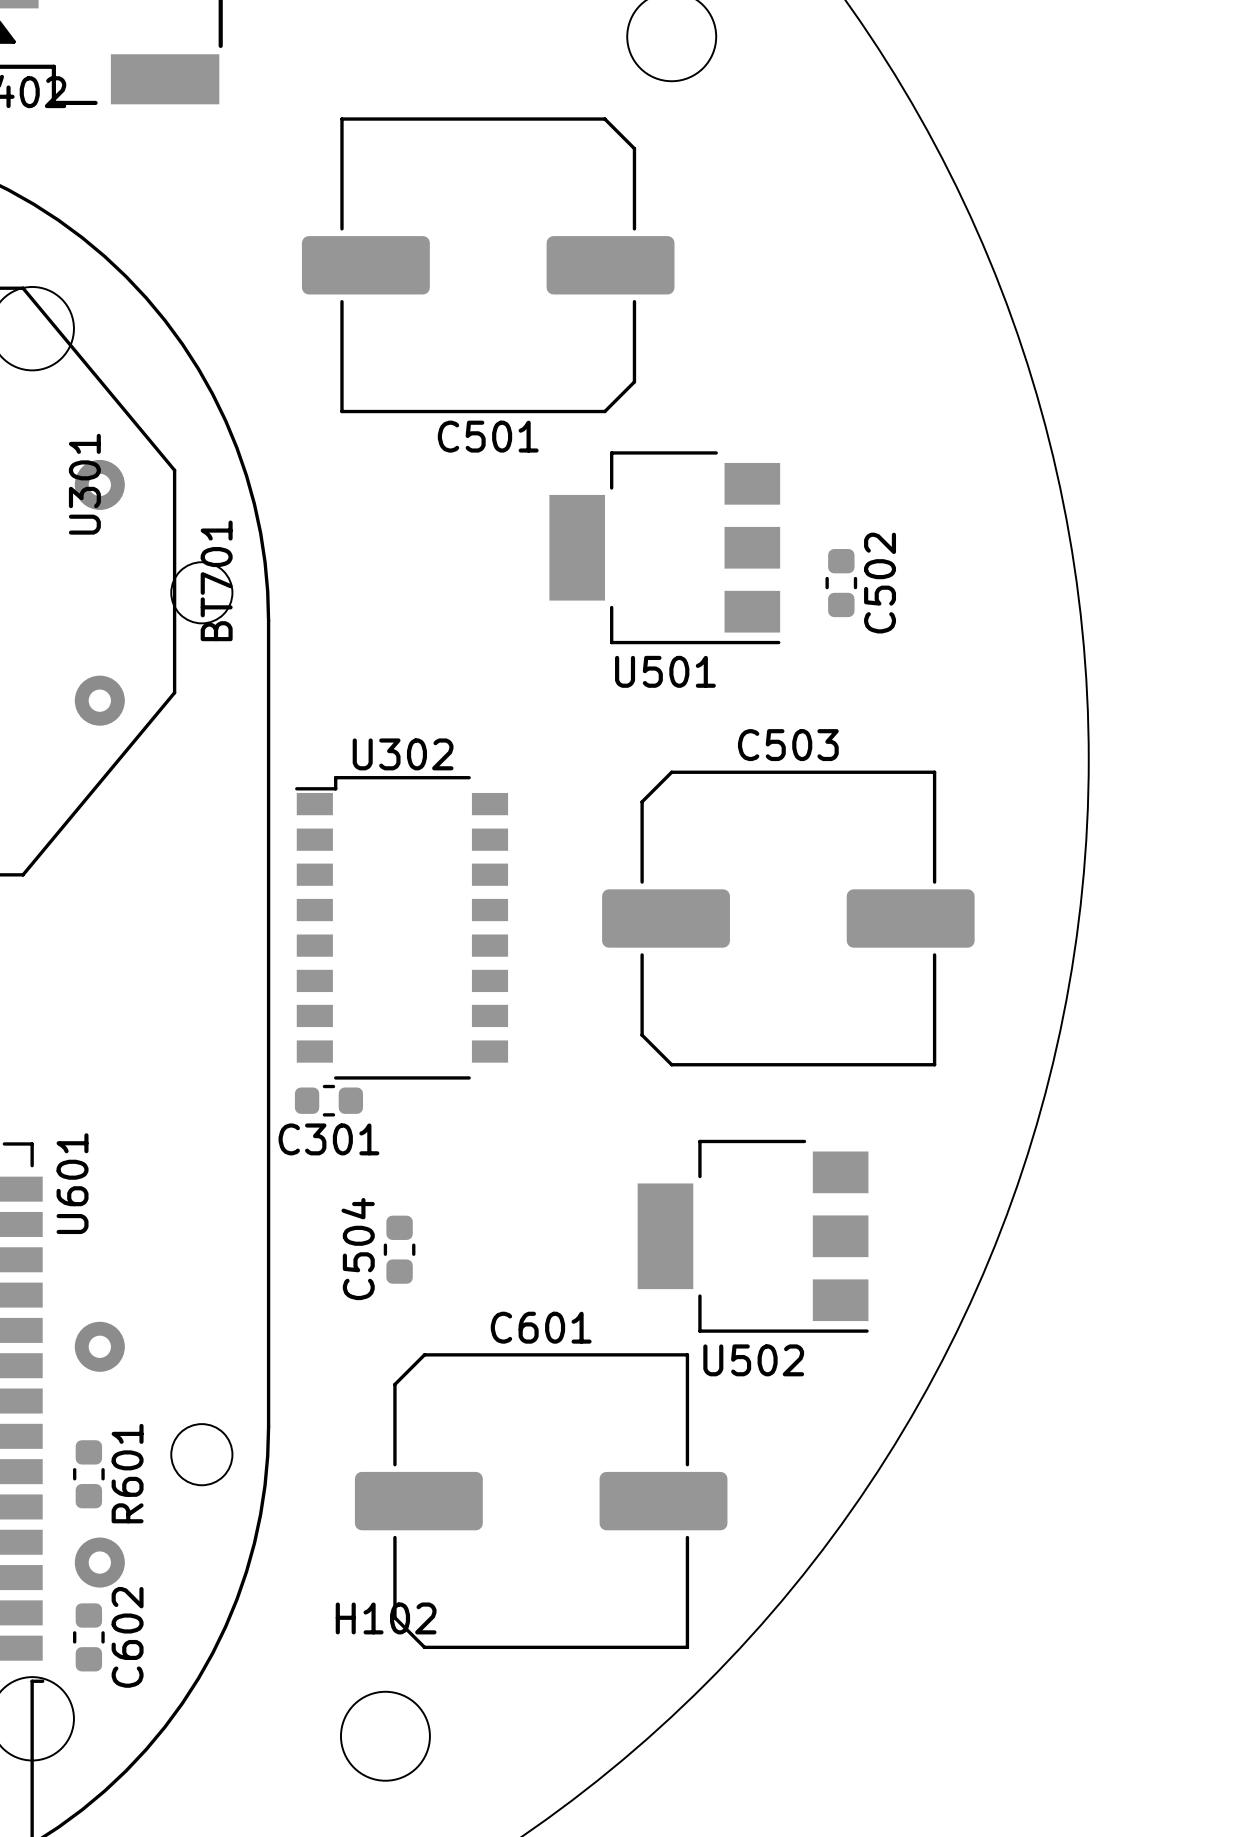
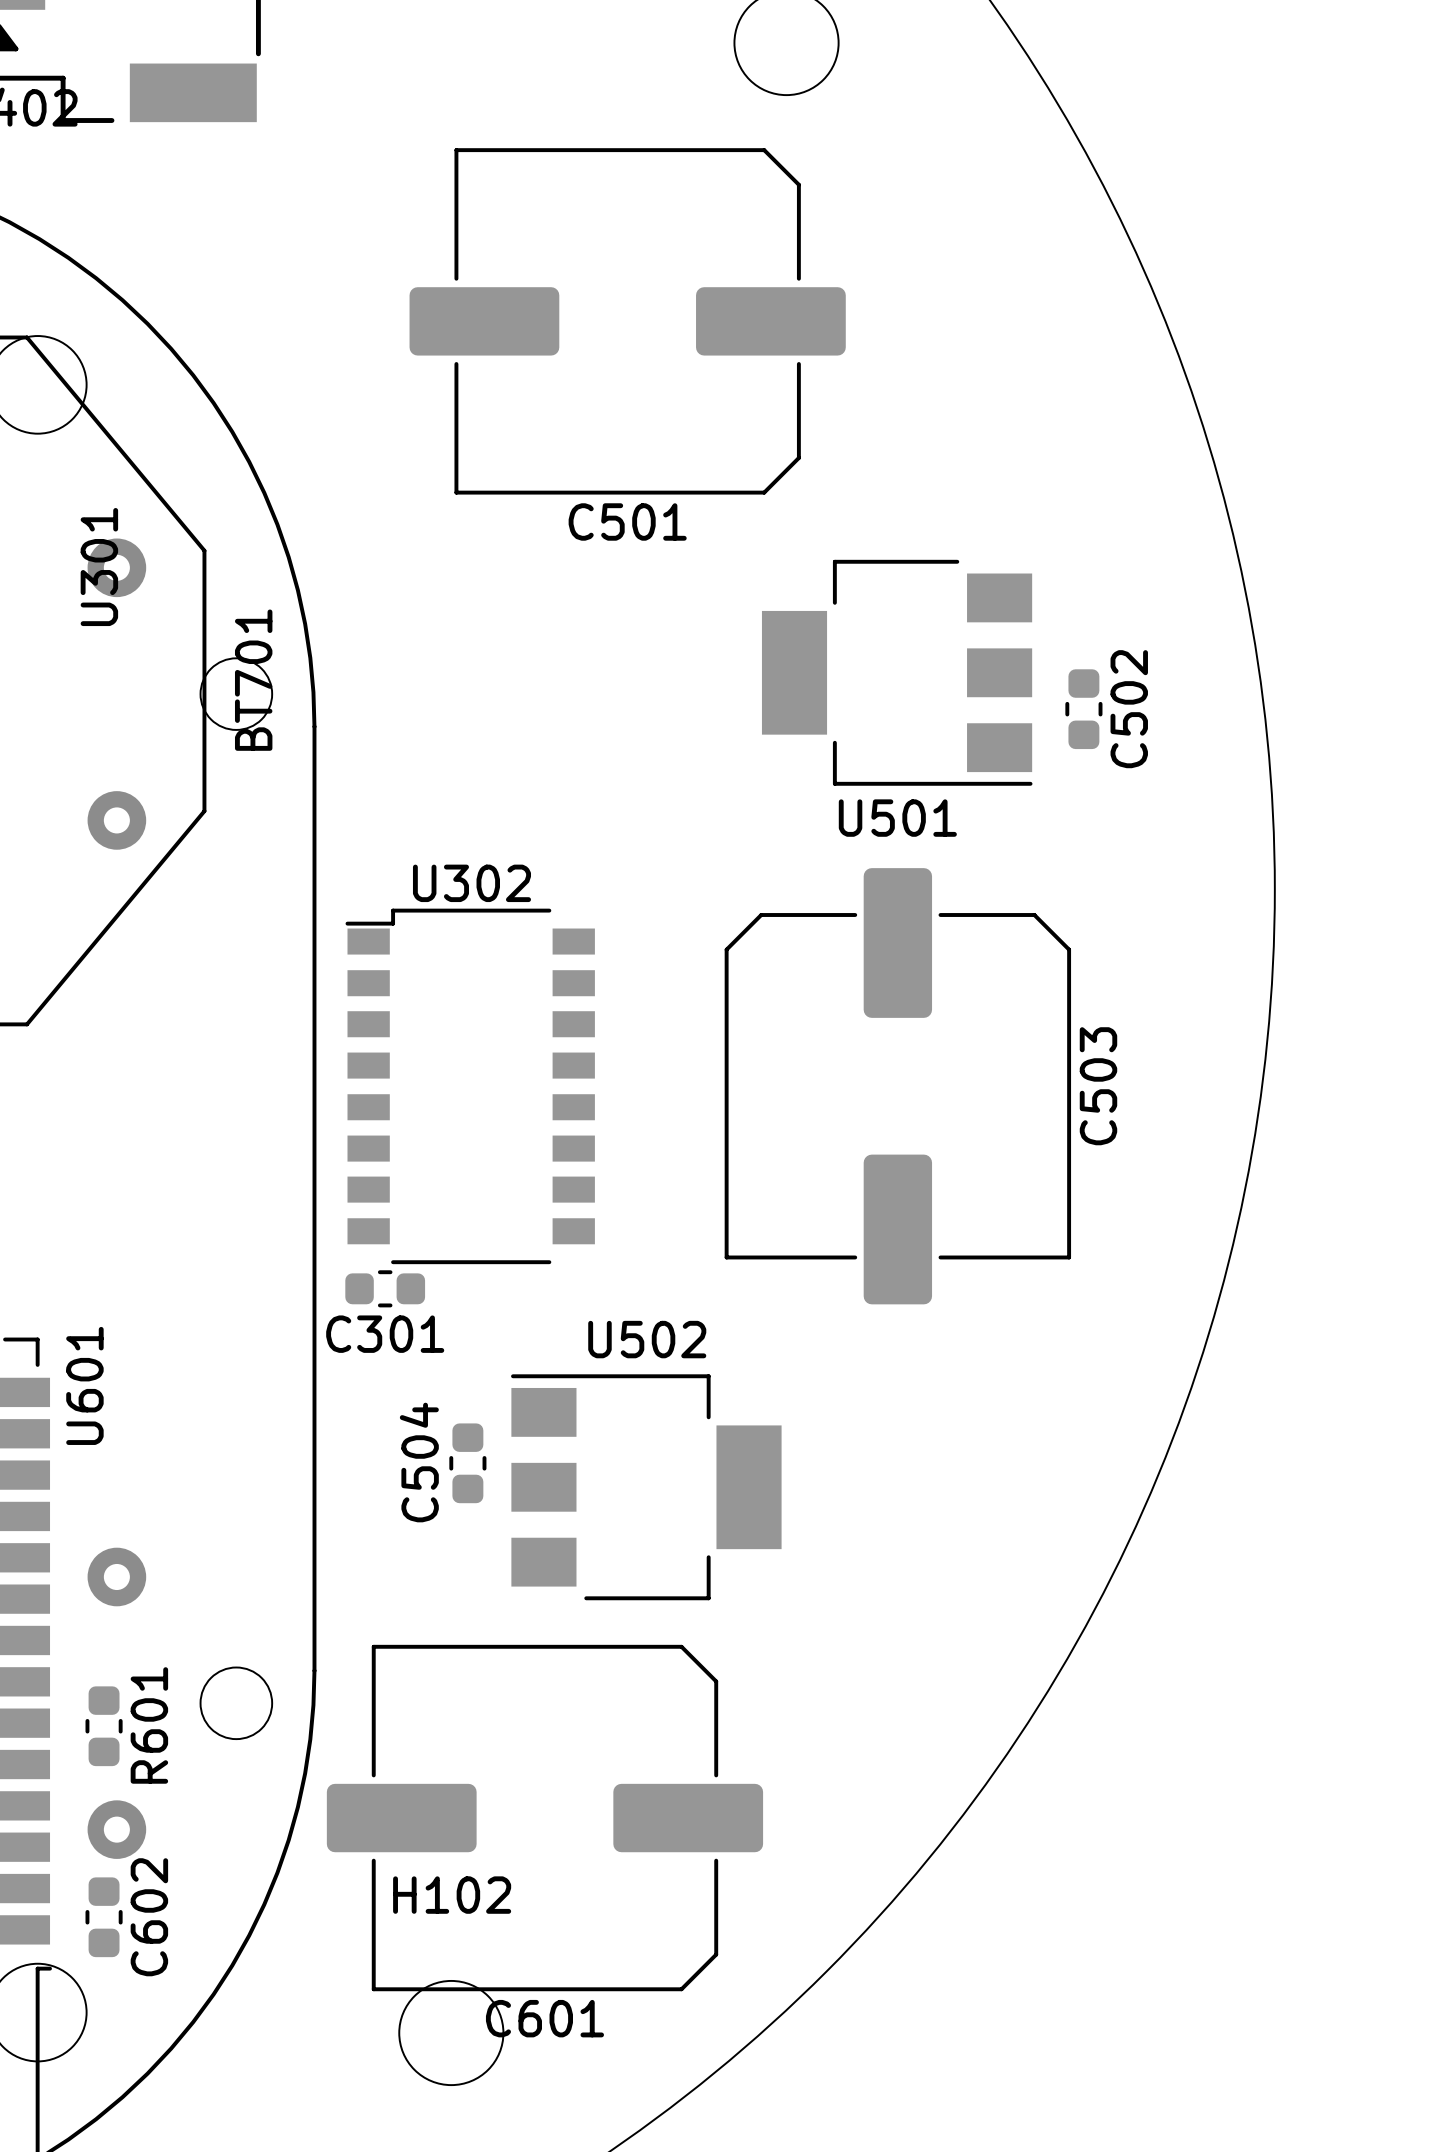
C501 position: (488, 265) -> (627, 321)
U501 position: (664, 547) -> (897, 672)
C502 position: (841, 583) -> (1083, 709)
C503 rotation: 0° (788, 918) -> 90° clockwise (897, 1086)
U502 rotation: 0° (753, 1236) -> 180° (646, 1487)
U502 position: (753, 1236) -> (646, 1487)
C601 rotation: 0° (541, 1501) -> 180° (544, 1818)

